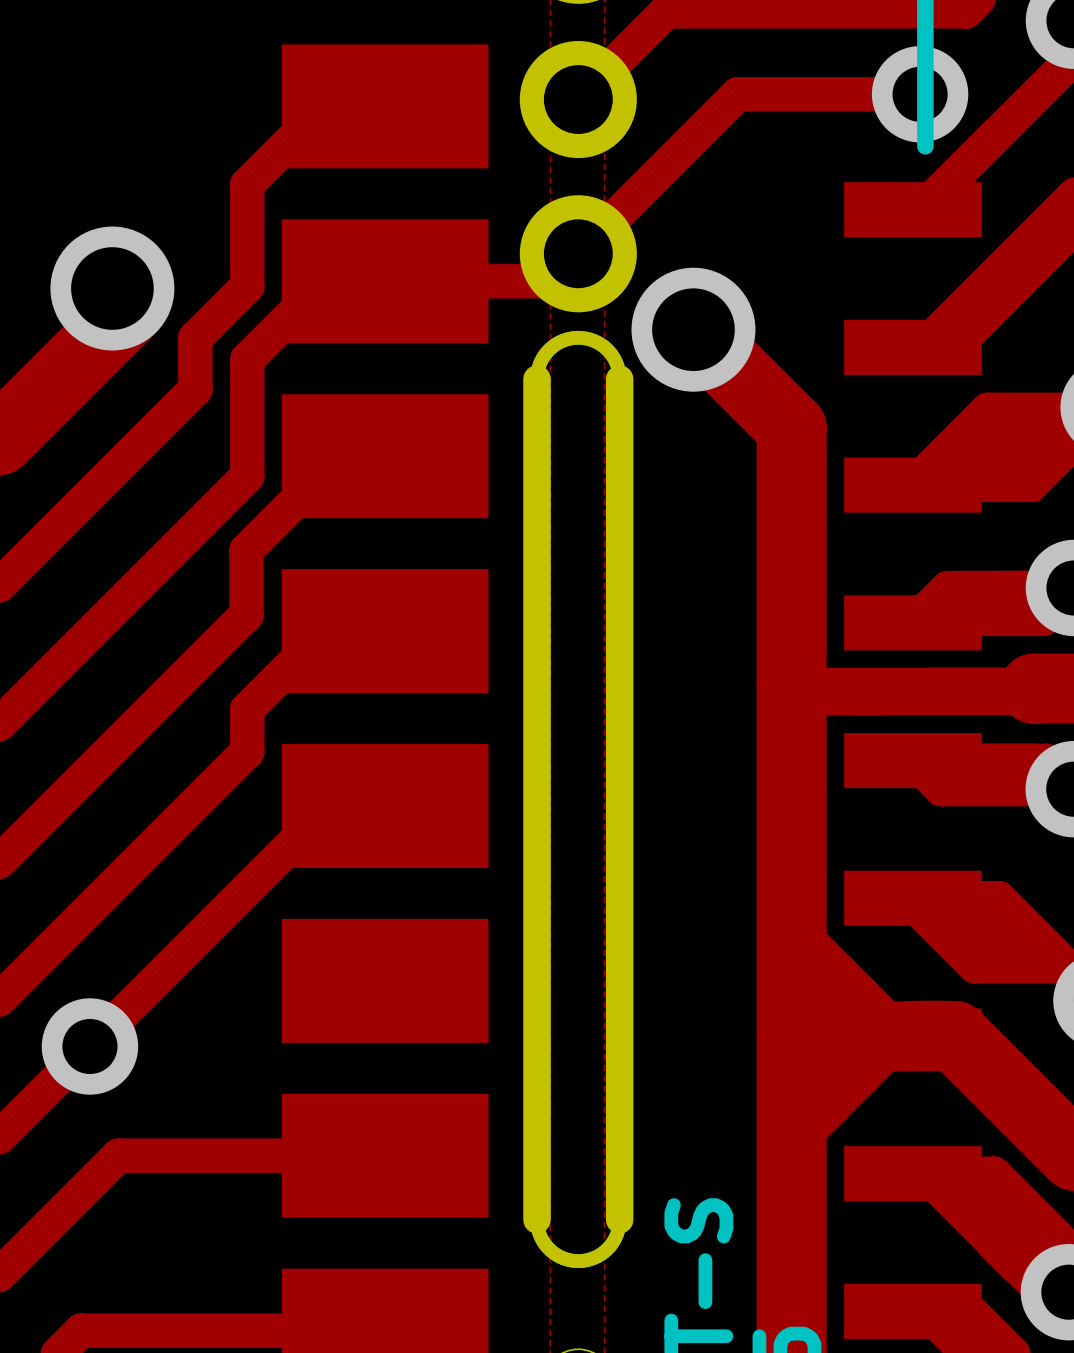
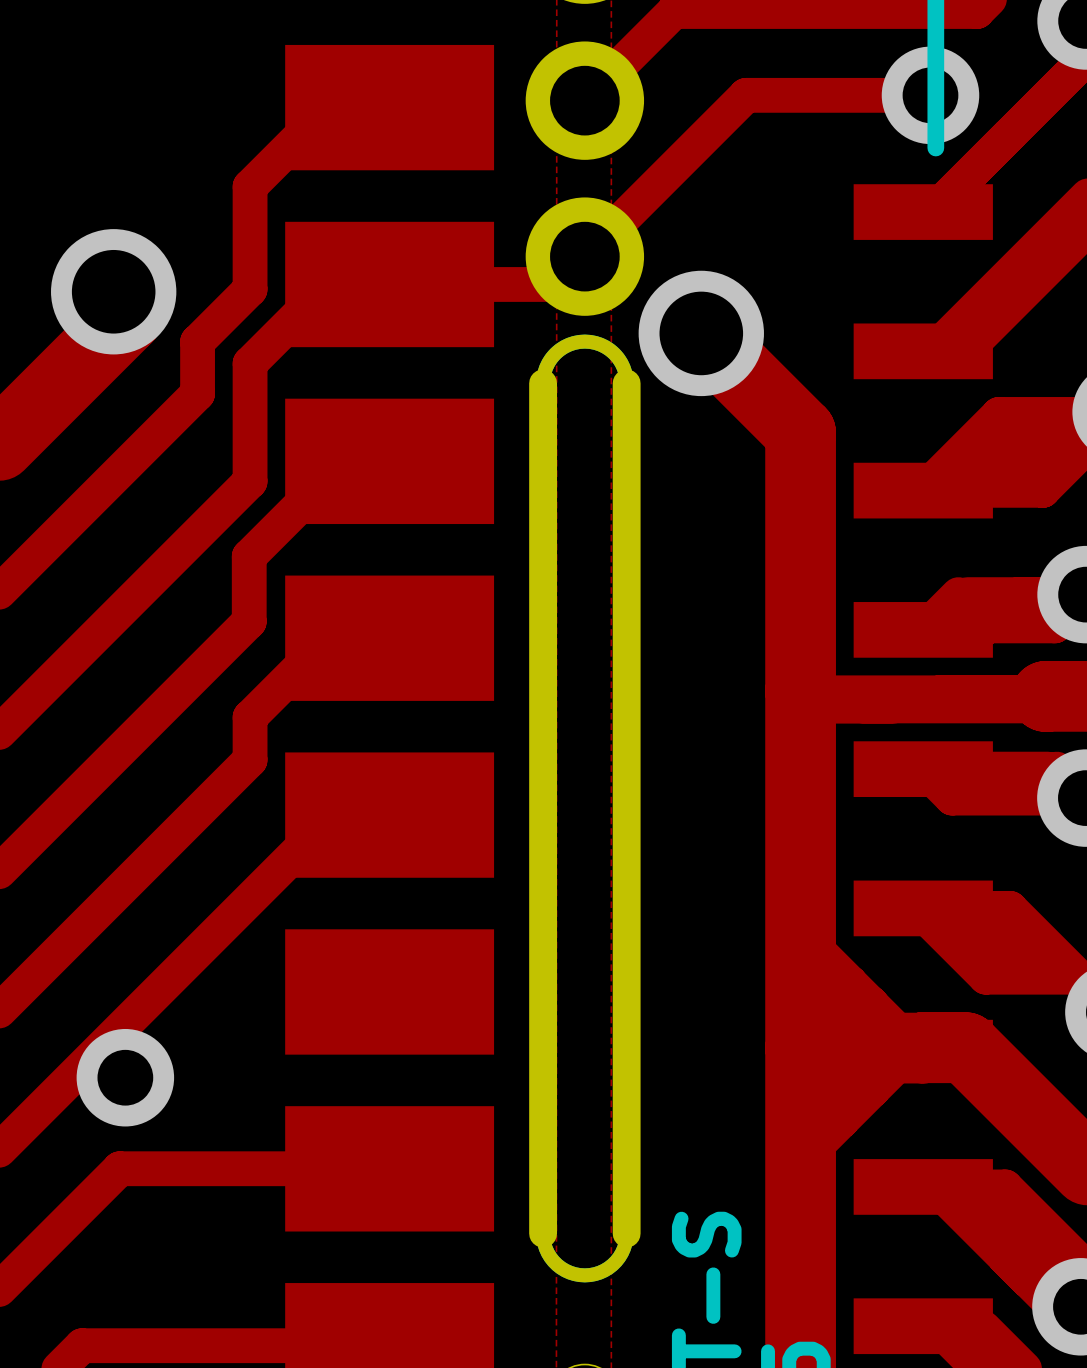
via position: (89, 1046) -> (125, 1077)

